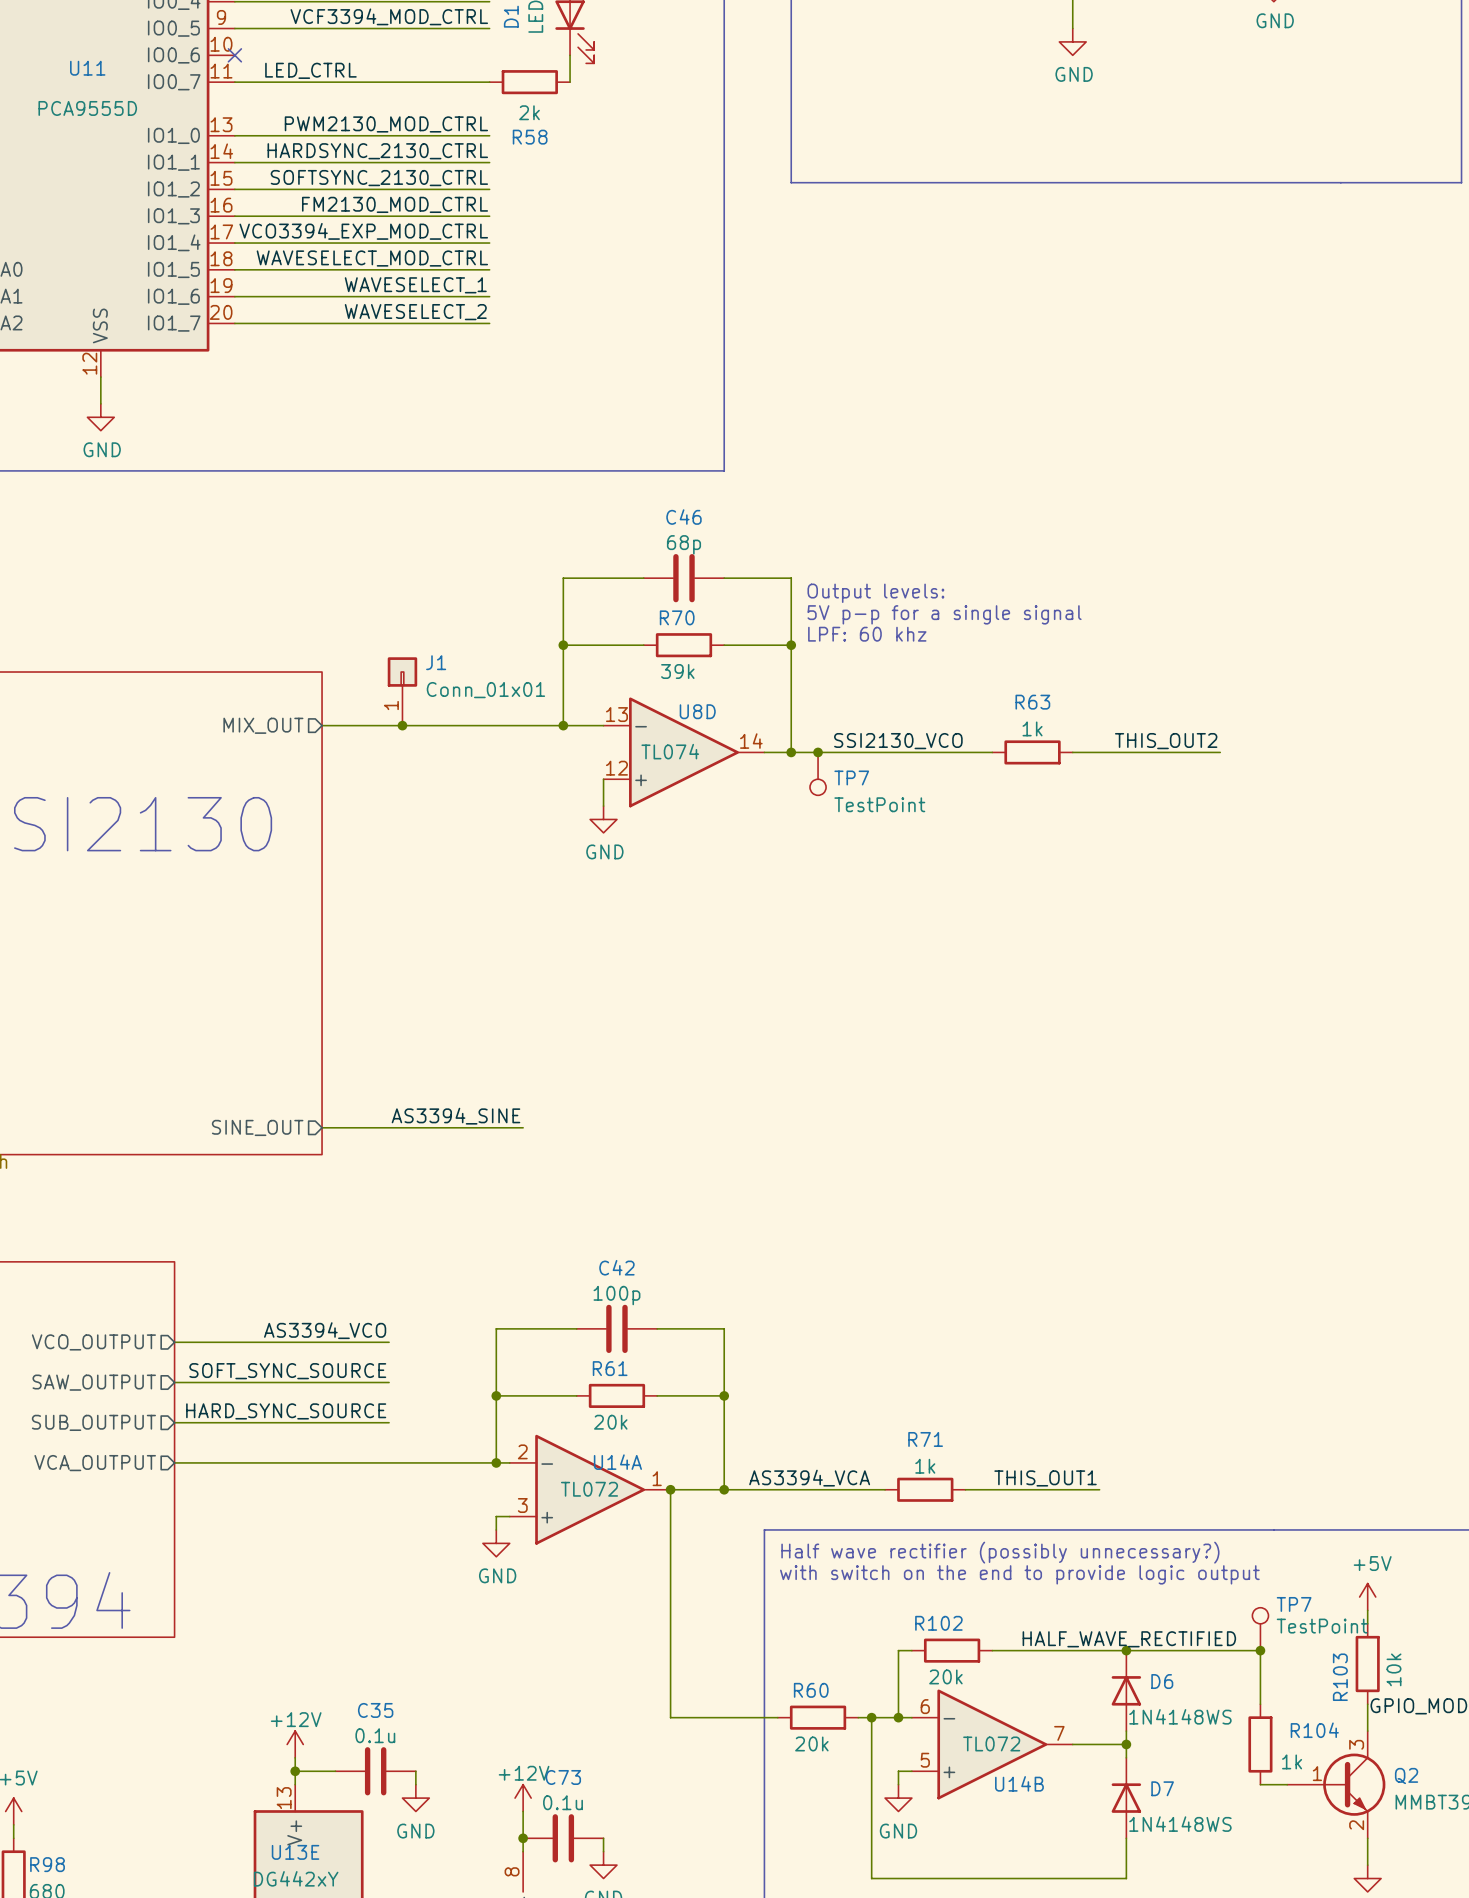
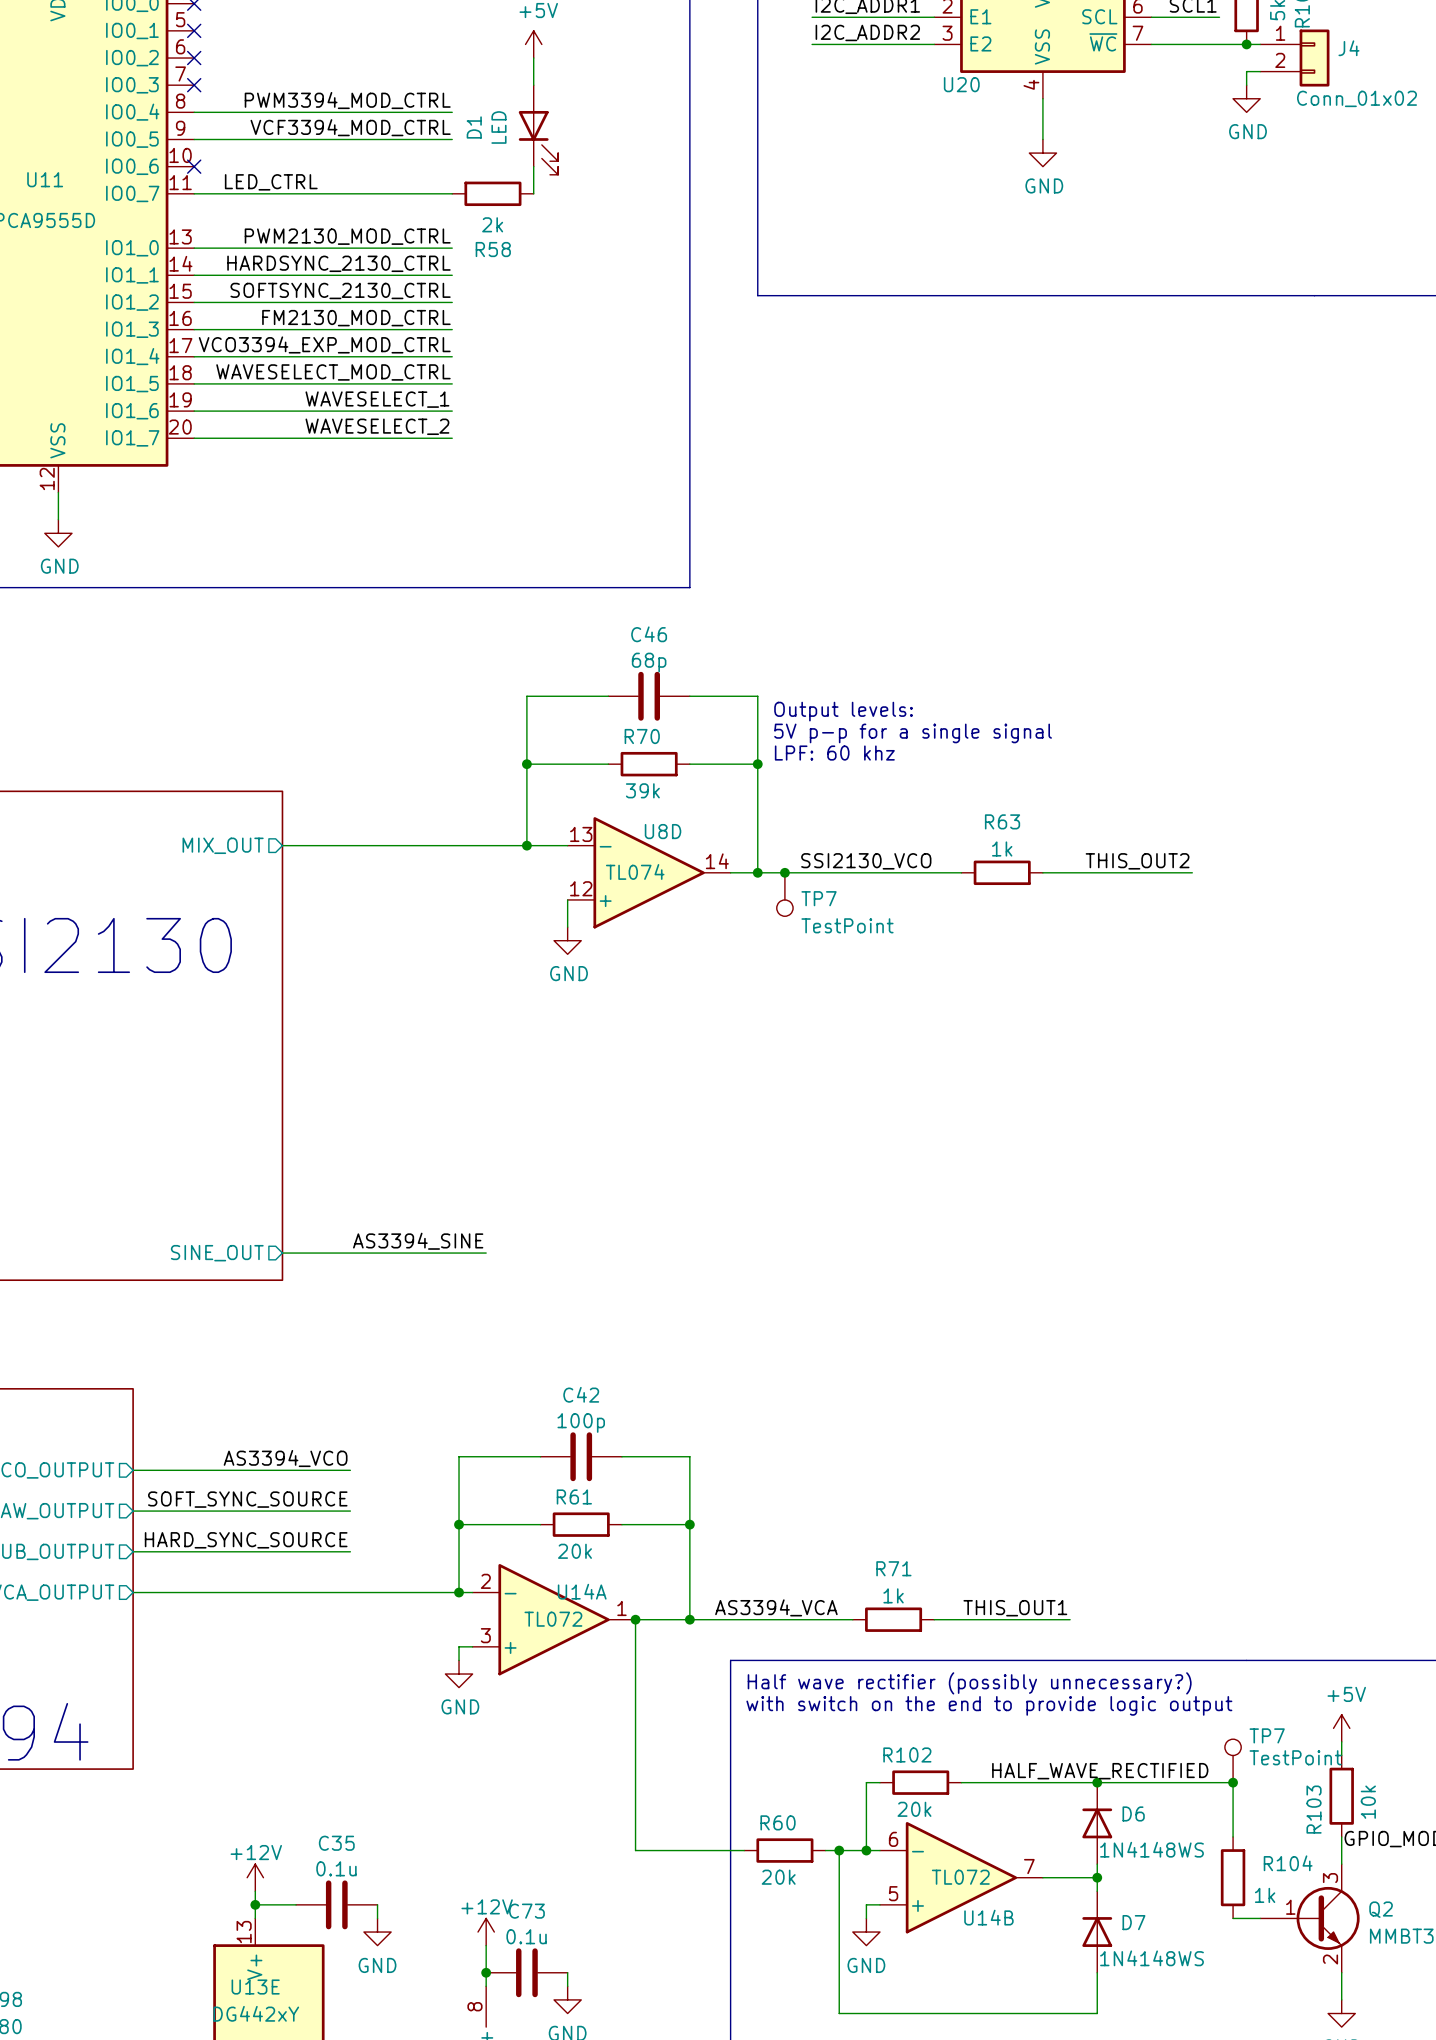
J1: Conn_01x01 (402, 691) -> none
junction: (402, 725) -> none

